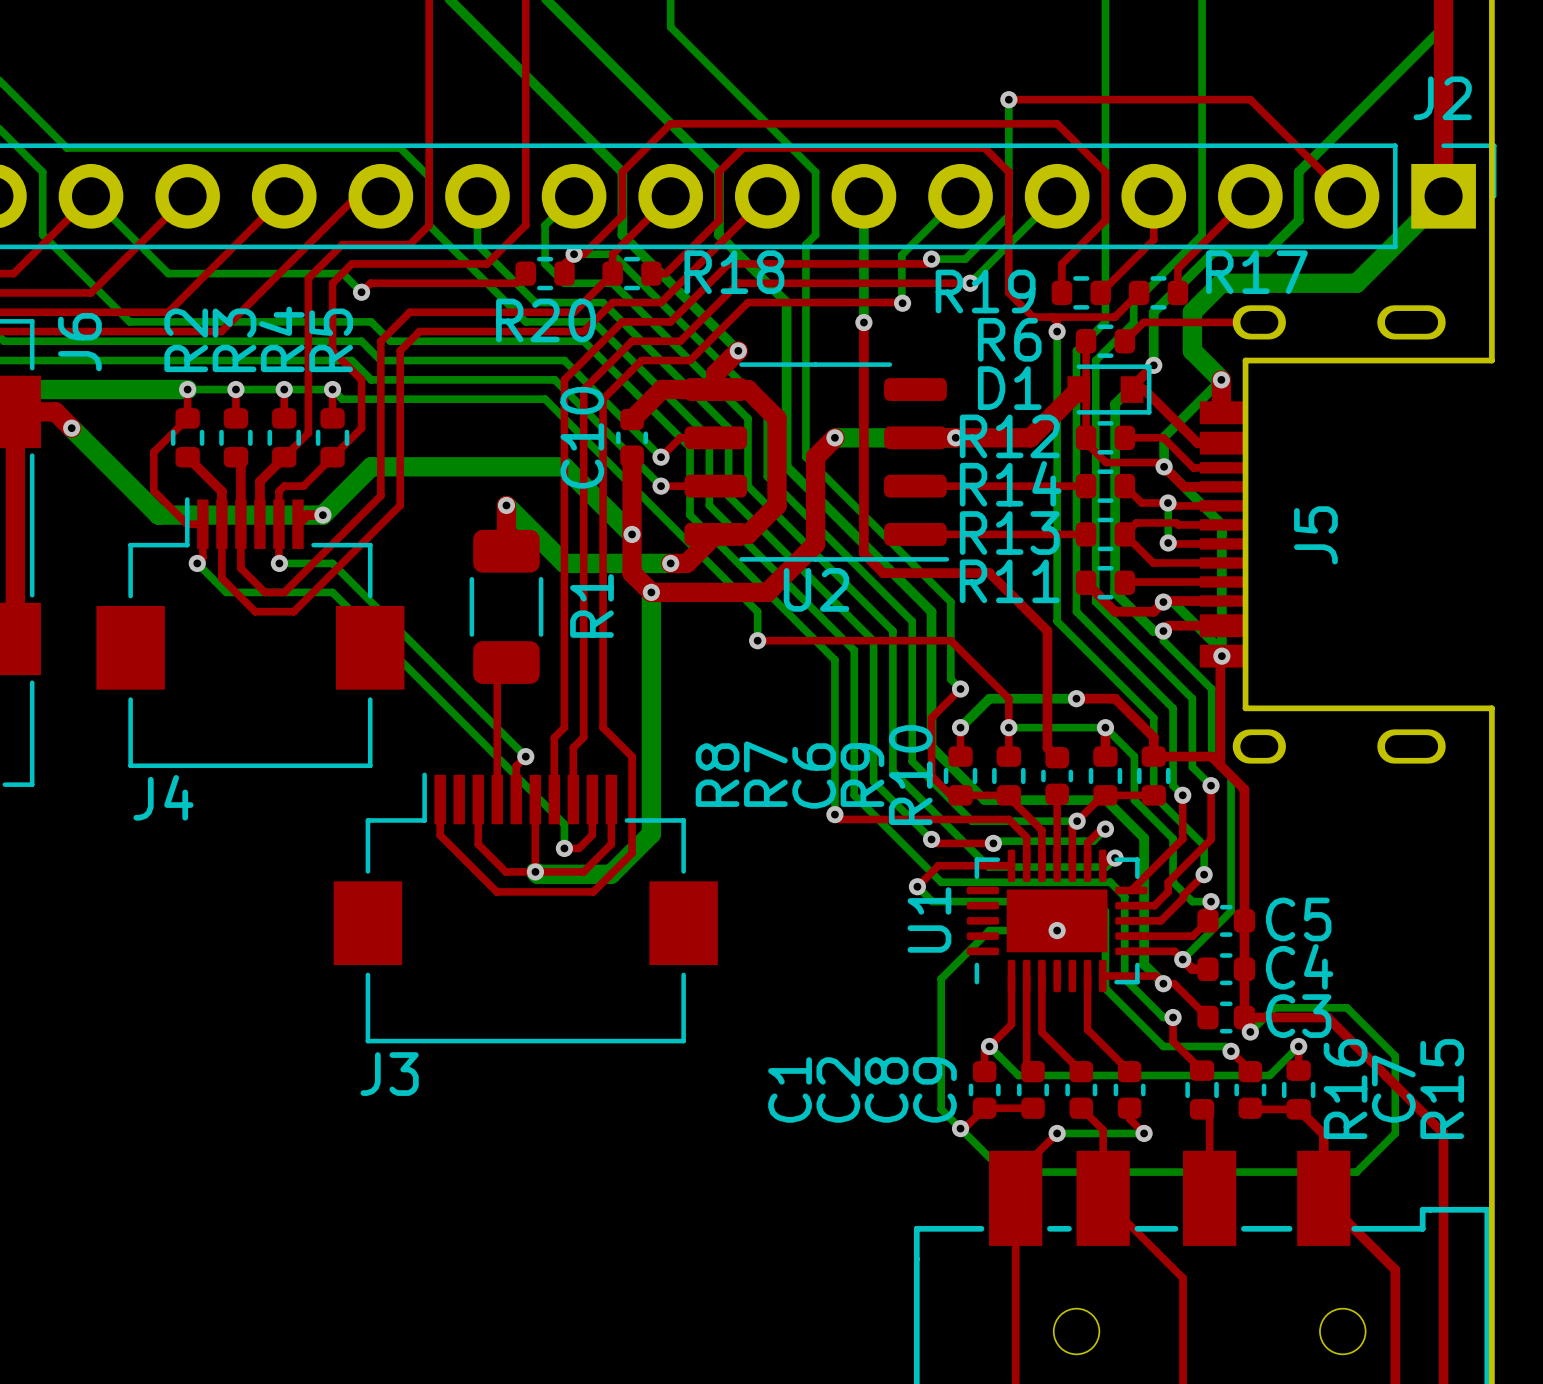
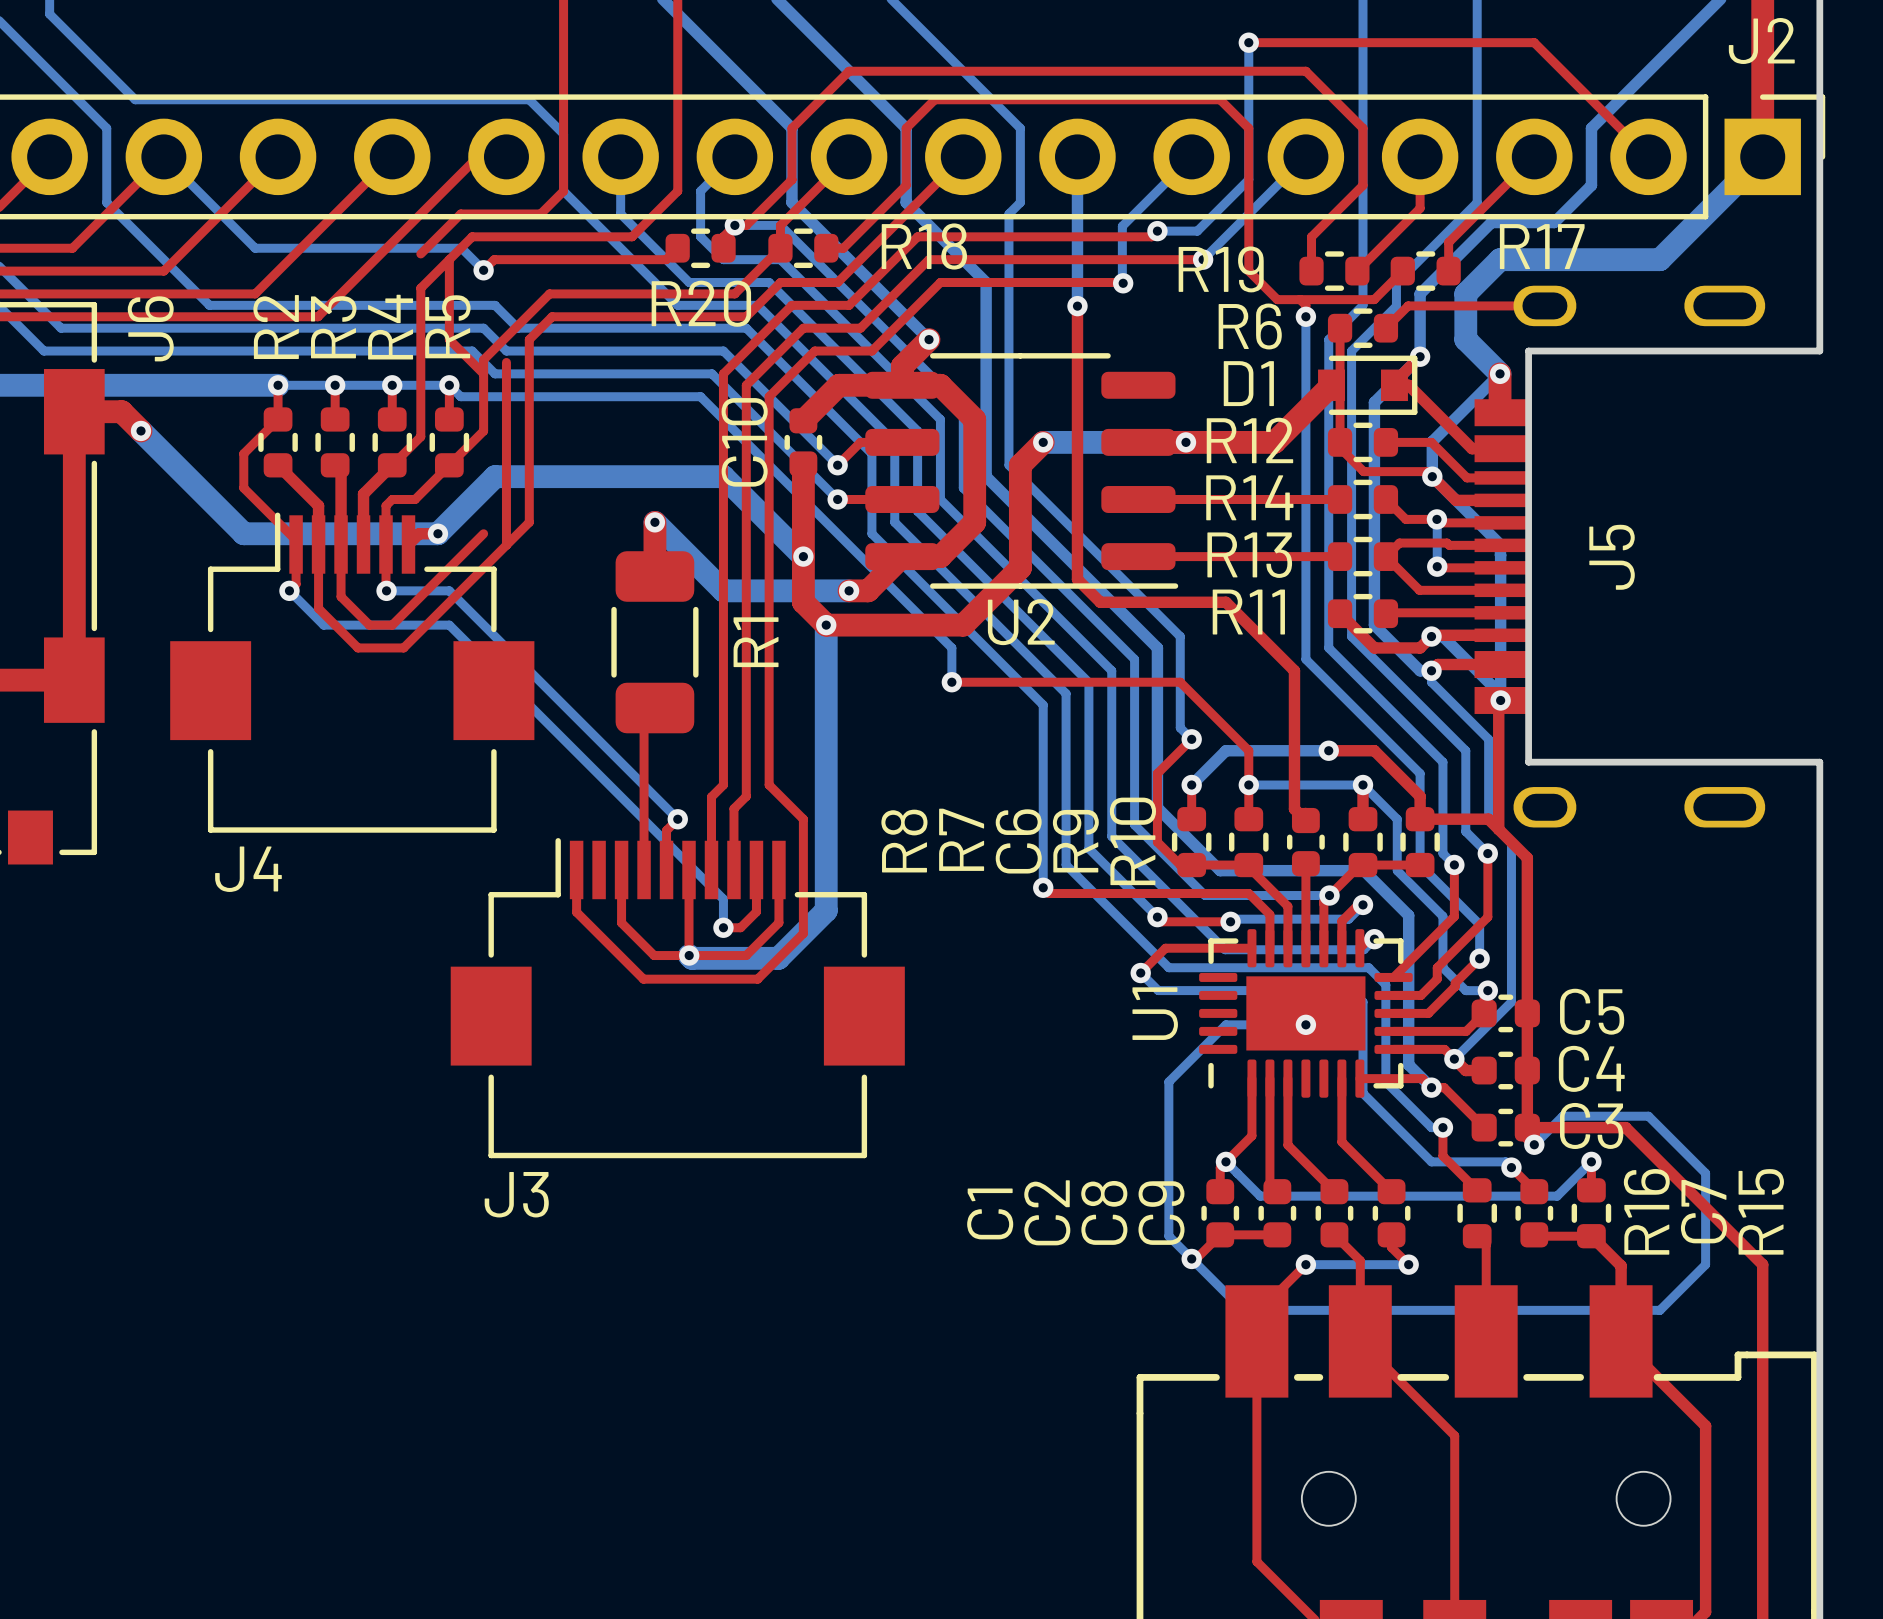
top track: (308, 278) (308, 307) -> (449, 259) (420, 288)
top track: (417, 312) (409, 312) (380, 341) (380, 370) -> (549, 293) (483, 359) (483, 373)
top track: (158, 447) (153, 452) (153, 490) (187, 524) (202, 524) -> (243, 453) (243, 488) (296, 540) (296, 544)
top track: (380, 495) (361, 515) -> (506, 510) (506, 545)

